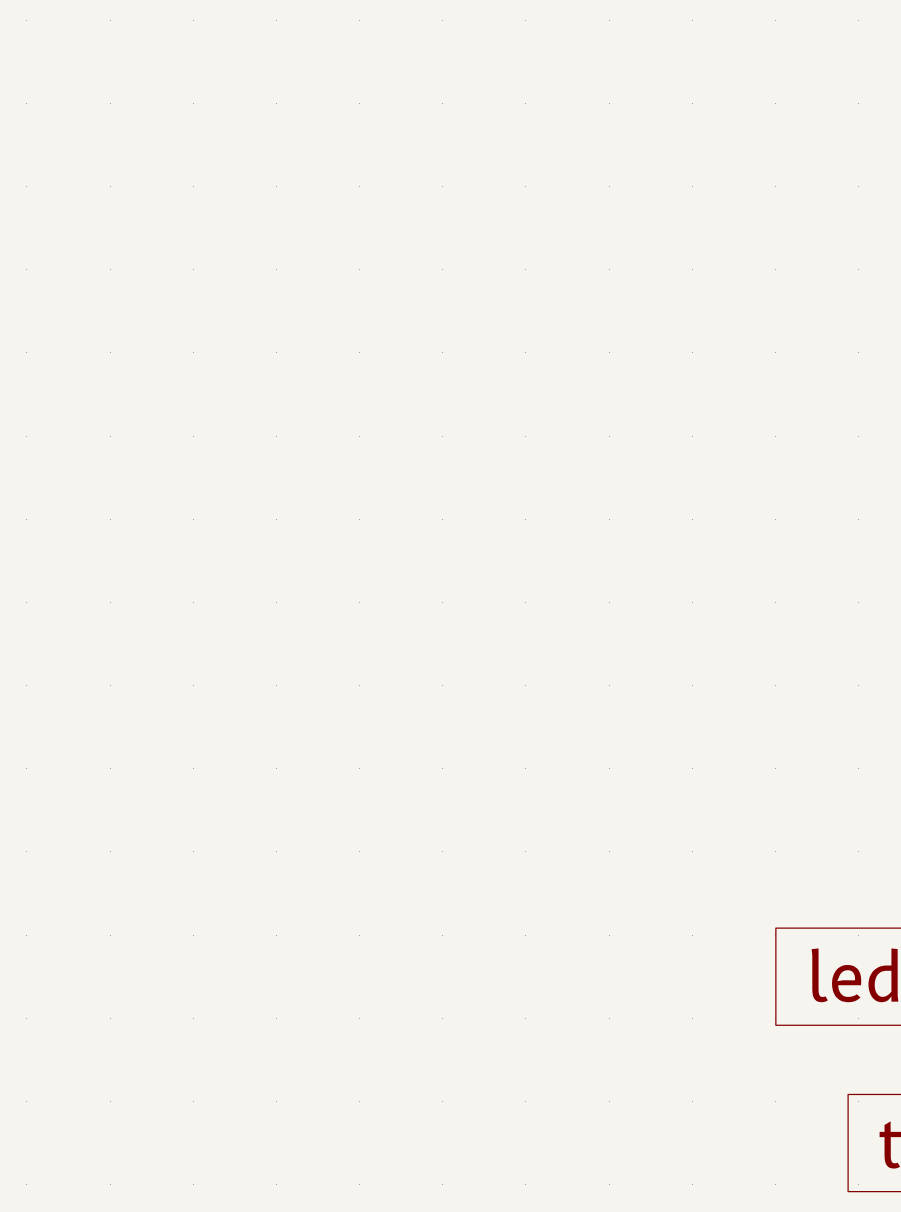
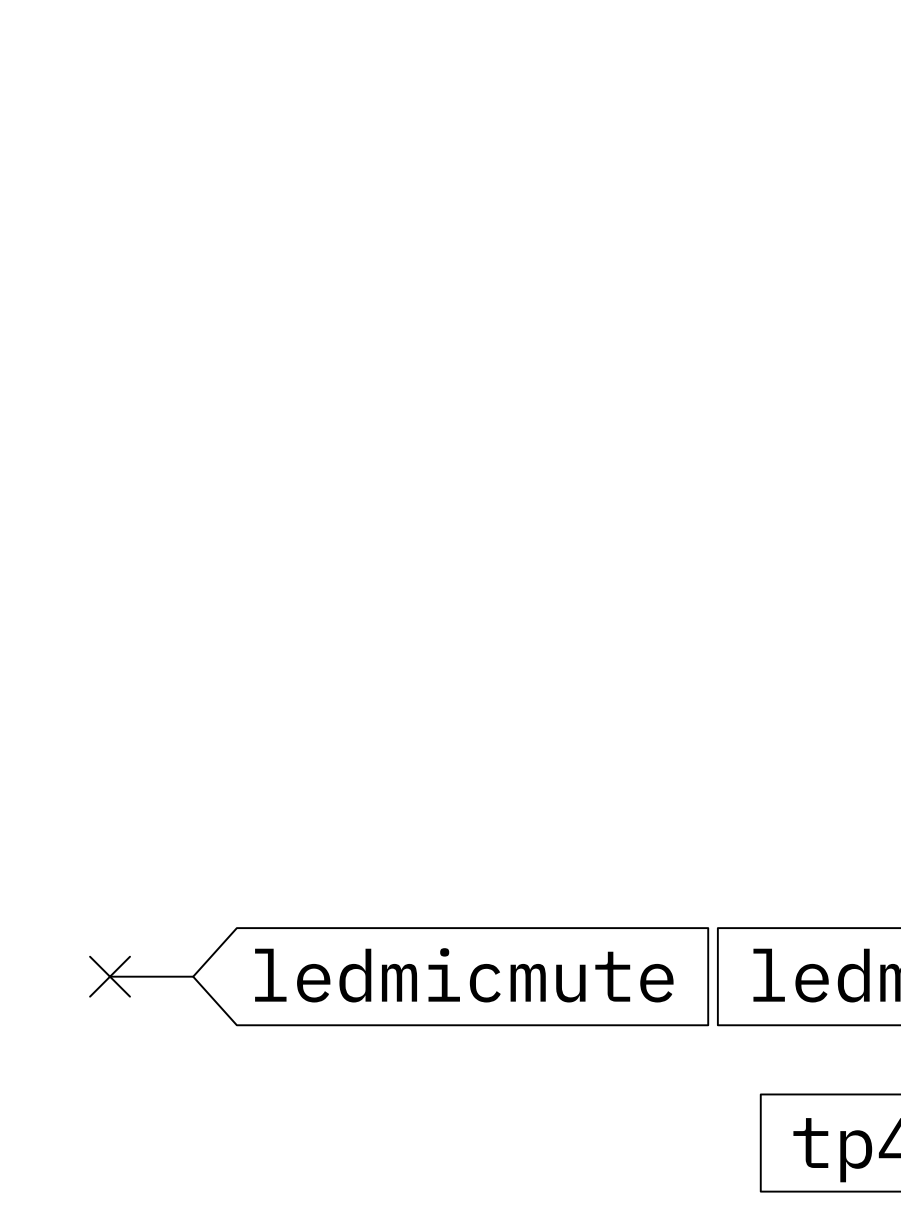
global label: none -> ledmicmute (464, 975)
wire: none -> (110, 976) (193, 976)
no-connect mark: none -> (110, 976)

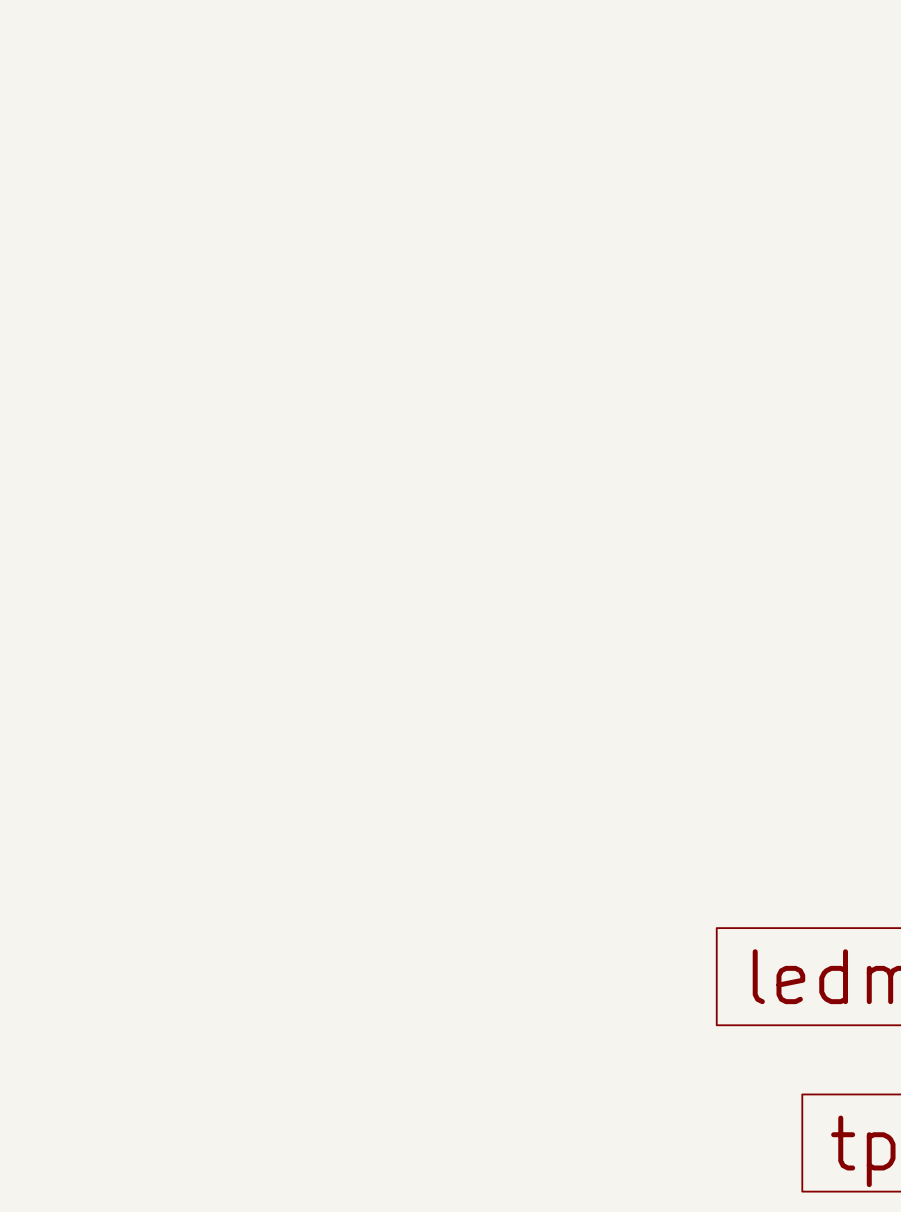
global label: ledmicmute (464, 975) -> none
wire: (110, 976) (193, 976) -> none
no-connect mark: (110, 976) -> none

